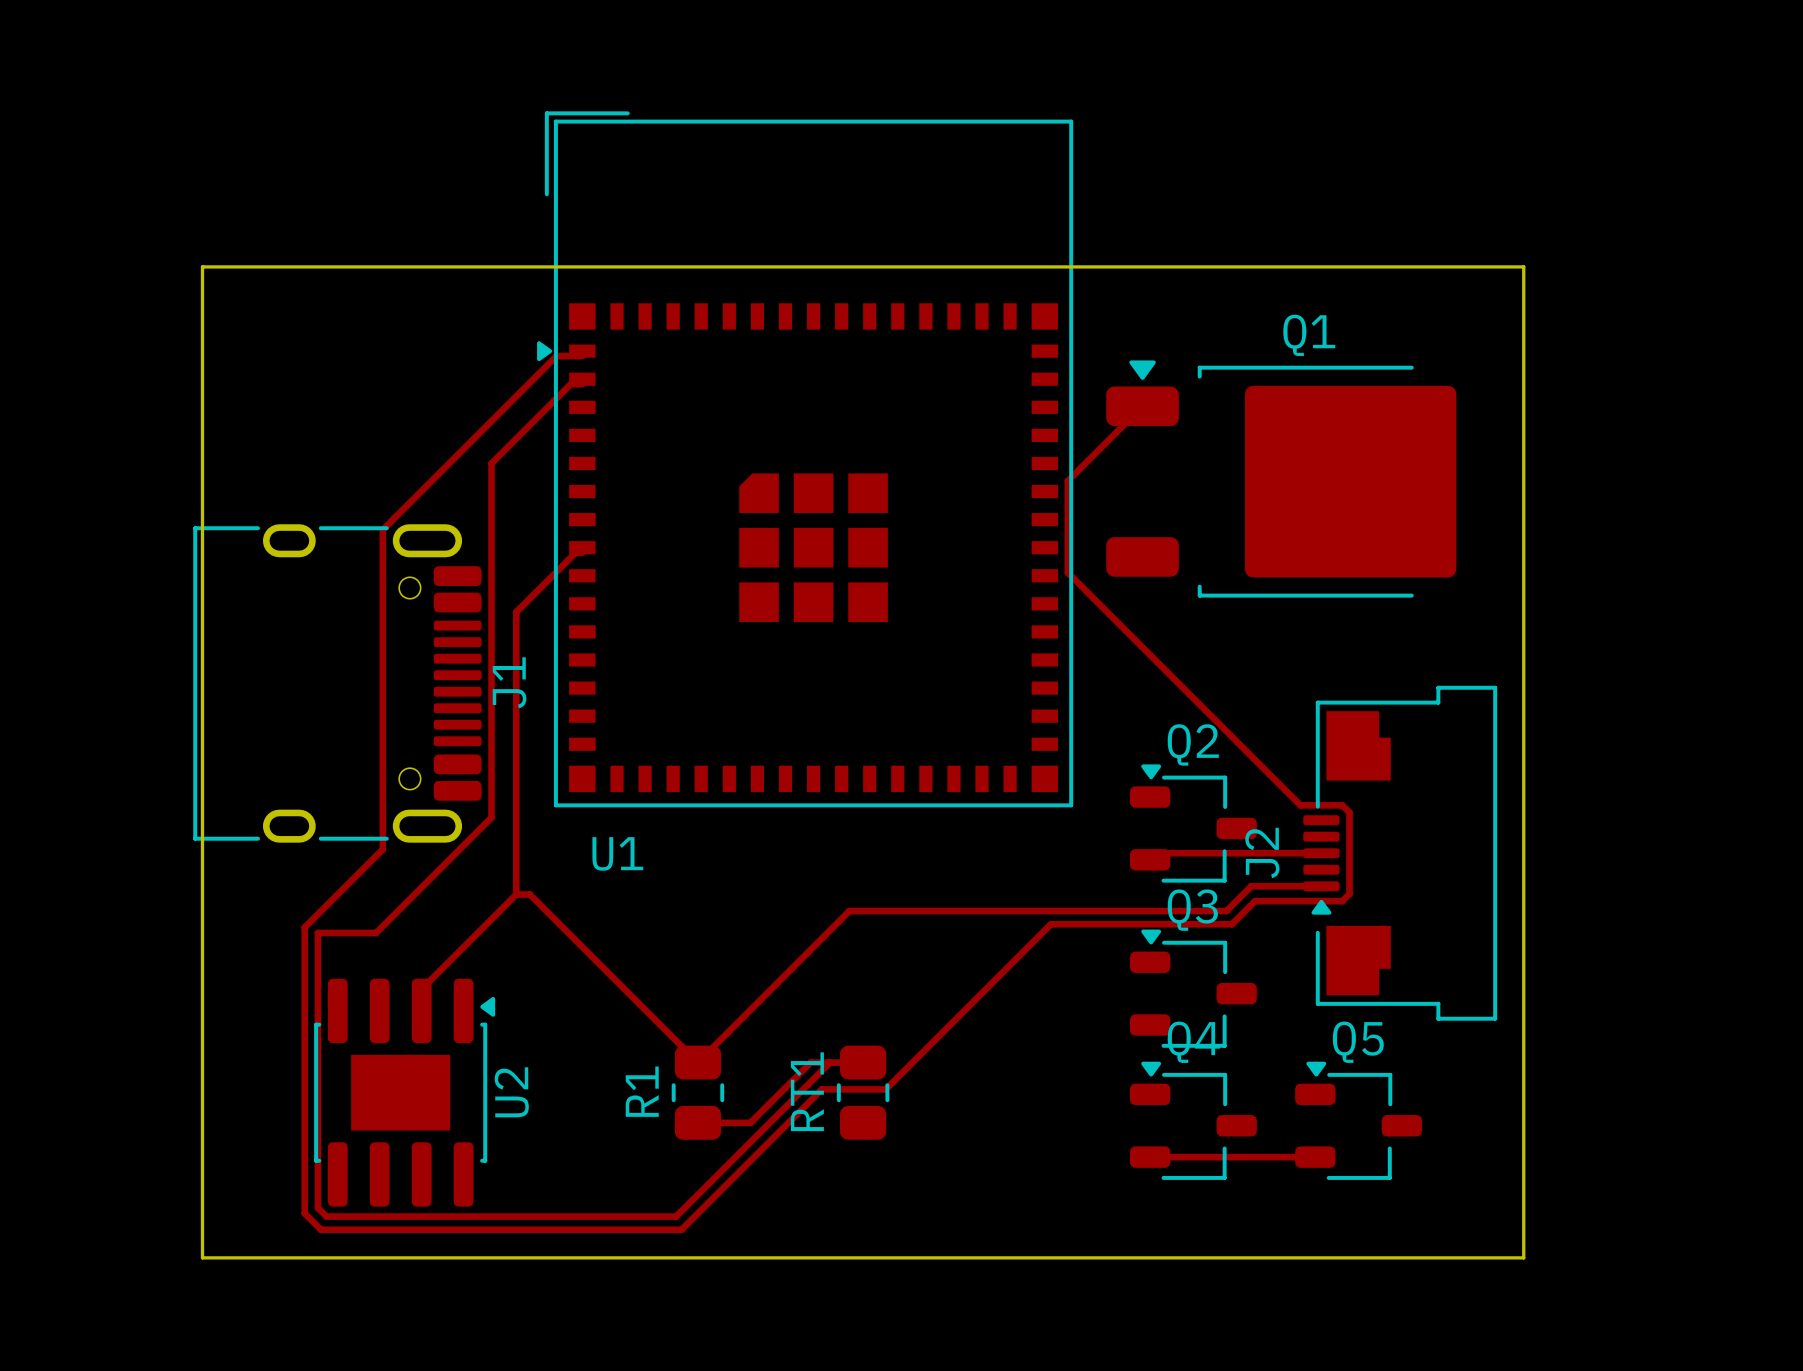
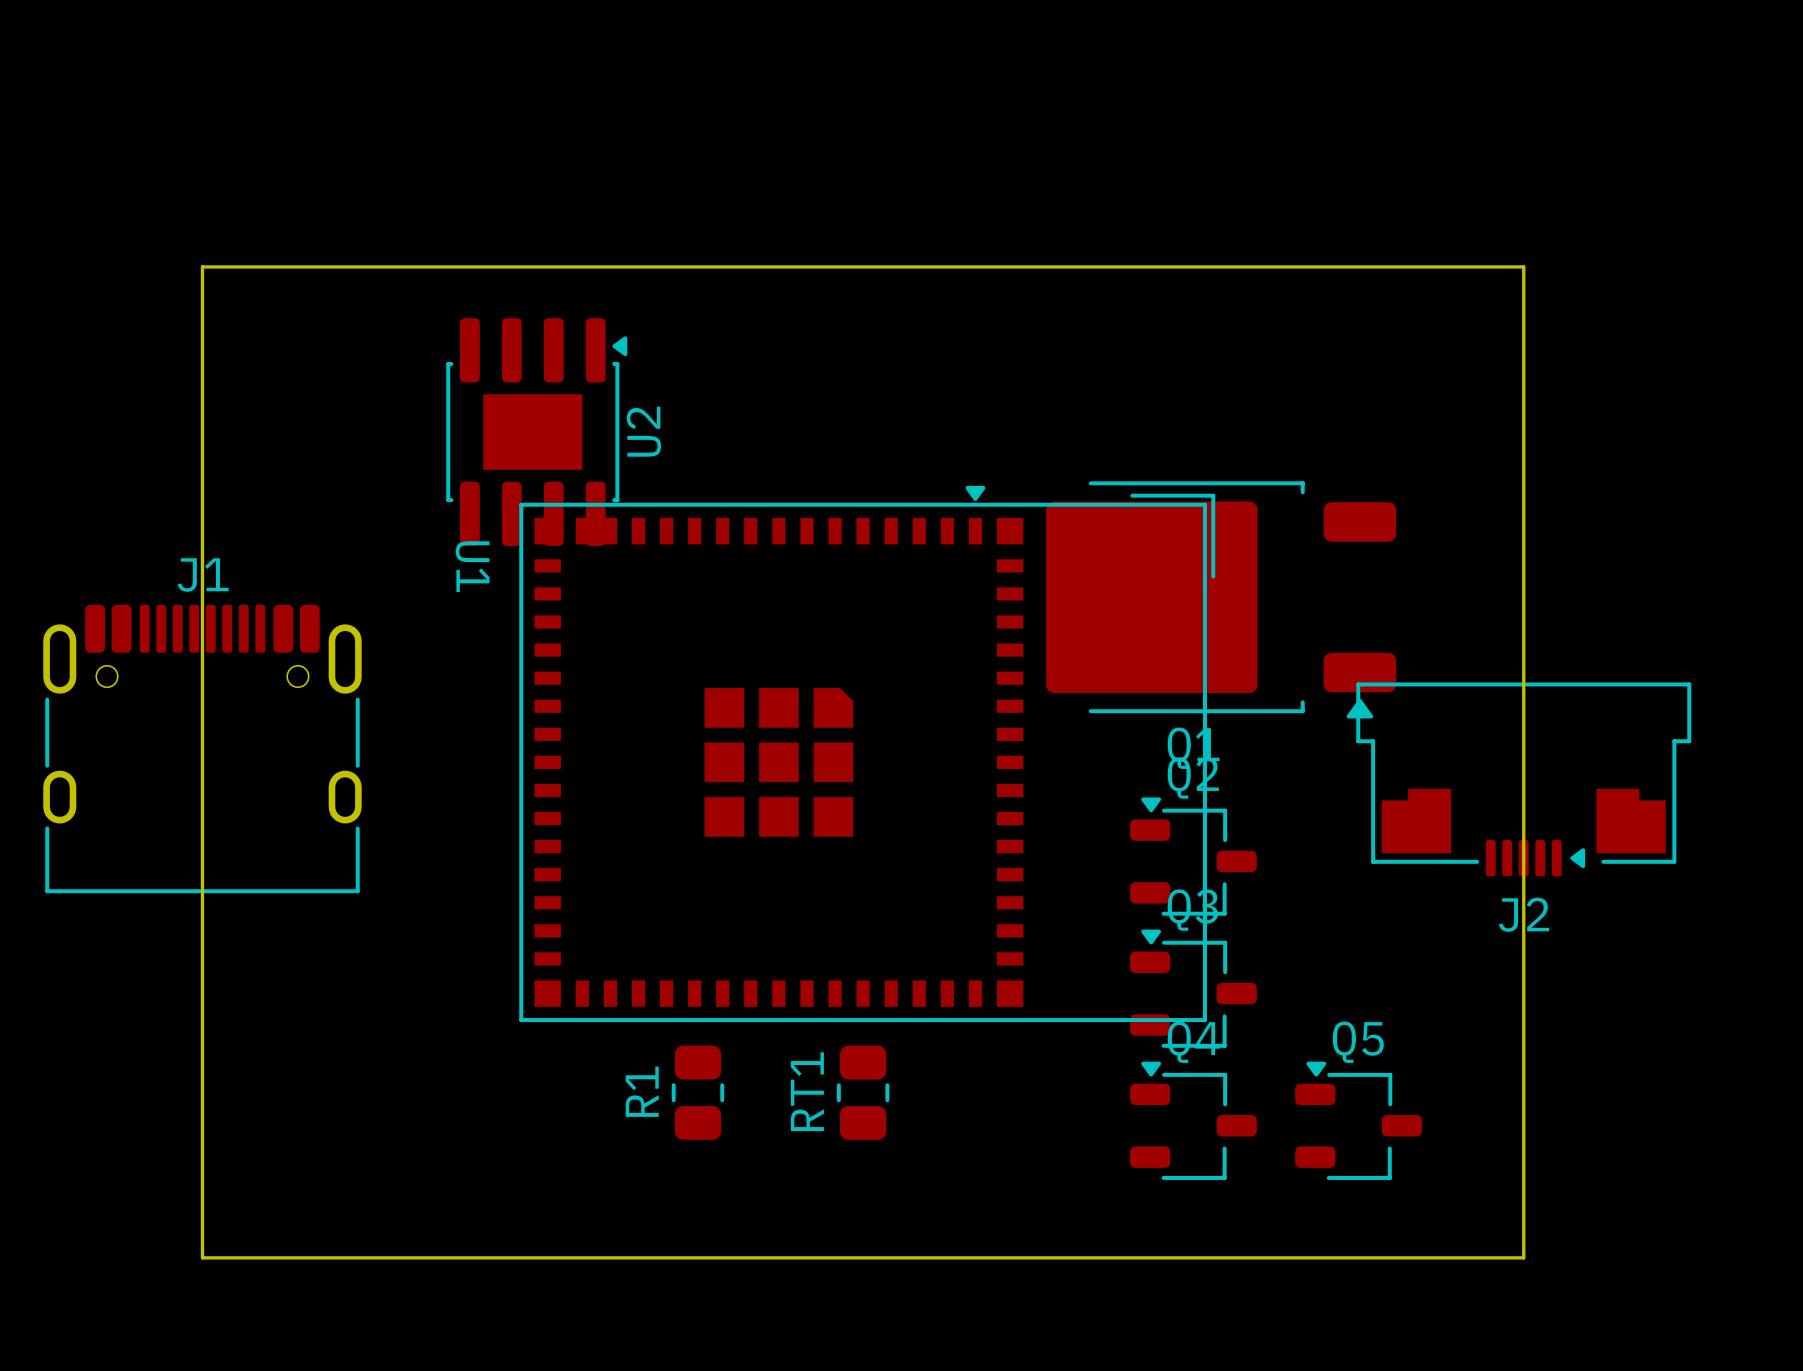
track: (582, 356) (556, 356) (382, 529) (382, 849) (304, 927) (304, 1213) (321, 1229) (681, 1229) (821, 1089) (885, 1089) (1050, 924) (1231, 924) (1255, 901) (1342, 901) (1349, 893) (1349, 812) (1342, 805) (1300, 805) (1067, 572) (1067, 480) (1142, 406) -> none
track: (582, 384) (570, 384) (491, 463) (491, 817) (376, 932) (317, 932) (317, 1208) (326, 1216) (676, 1216) (830, 1062) -> none
U1 rotation: 0° (805, 459) -> 90° clockwise (867, 753)
Q1 rotation: 0° (1281, 478) -> 180° (1221, 599)
track: (582, 552) (575, 552) (516, 612) (516, 894) -> none
J1 rotation: 0° (337, 683) -> 90° counterclockwise (202, 749)
Q2 position: (1193, 823) -> (1193, 856)
track: (1321, 853) (1156, 853) (1150, 859) -> none
J2 rotation: 0° (1400, 853) -> 90° counterclockwise (1523, 779)
track: (1321, 886) (1251, 886) (1226, 911) (849, 911) (697, 1062) (529, 894) (516, 894) -> none
track: (516, 894) (421, 989) (421, 1010) -> none
track: (863, 1062) (810, 1062) (750, 1122) (697, 1122) -> none
U2 position: (404, 1092) -> (536, 432)
track: (1150, 1157) (1315, 1157) -> none

